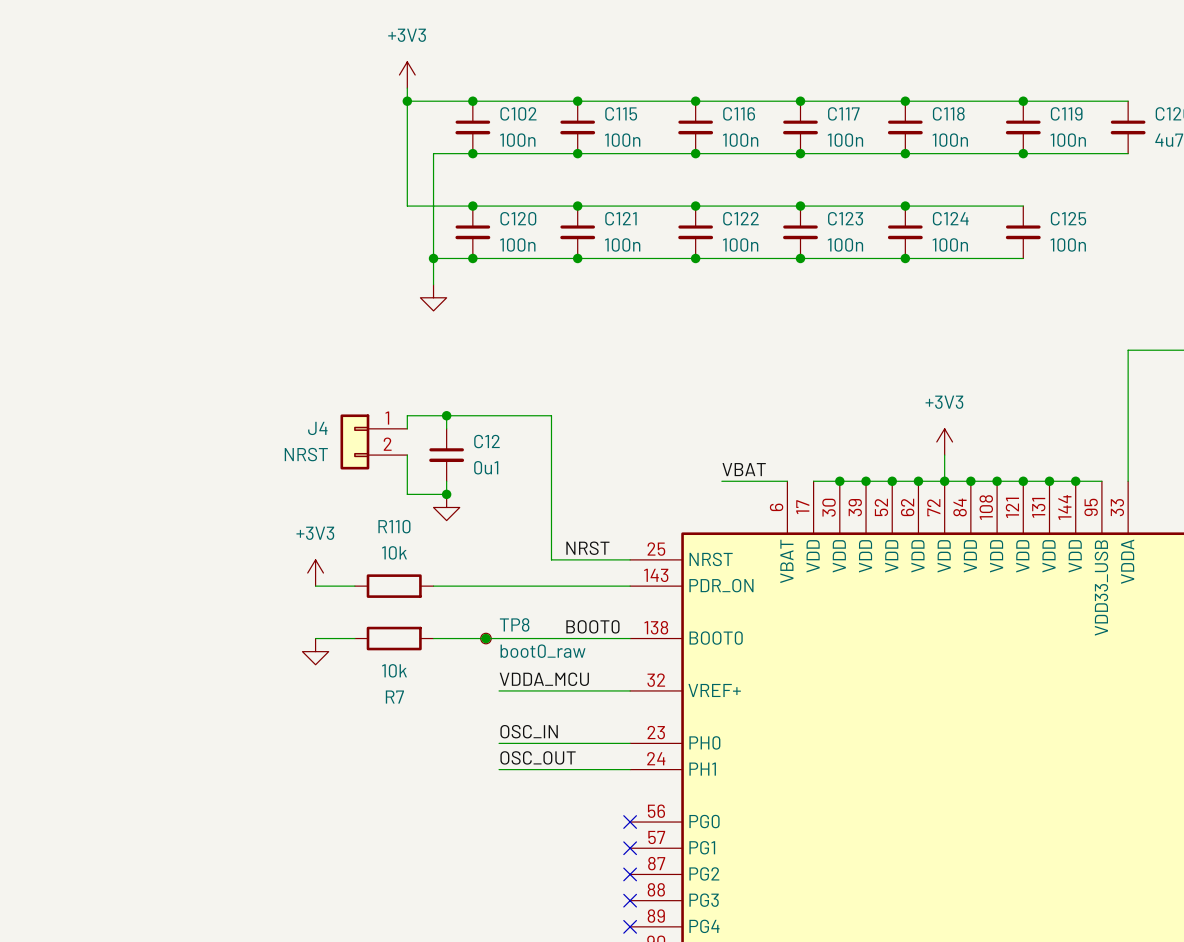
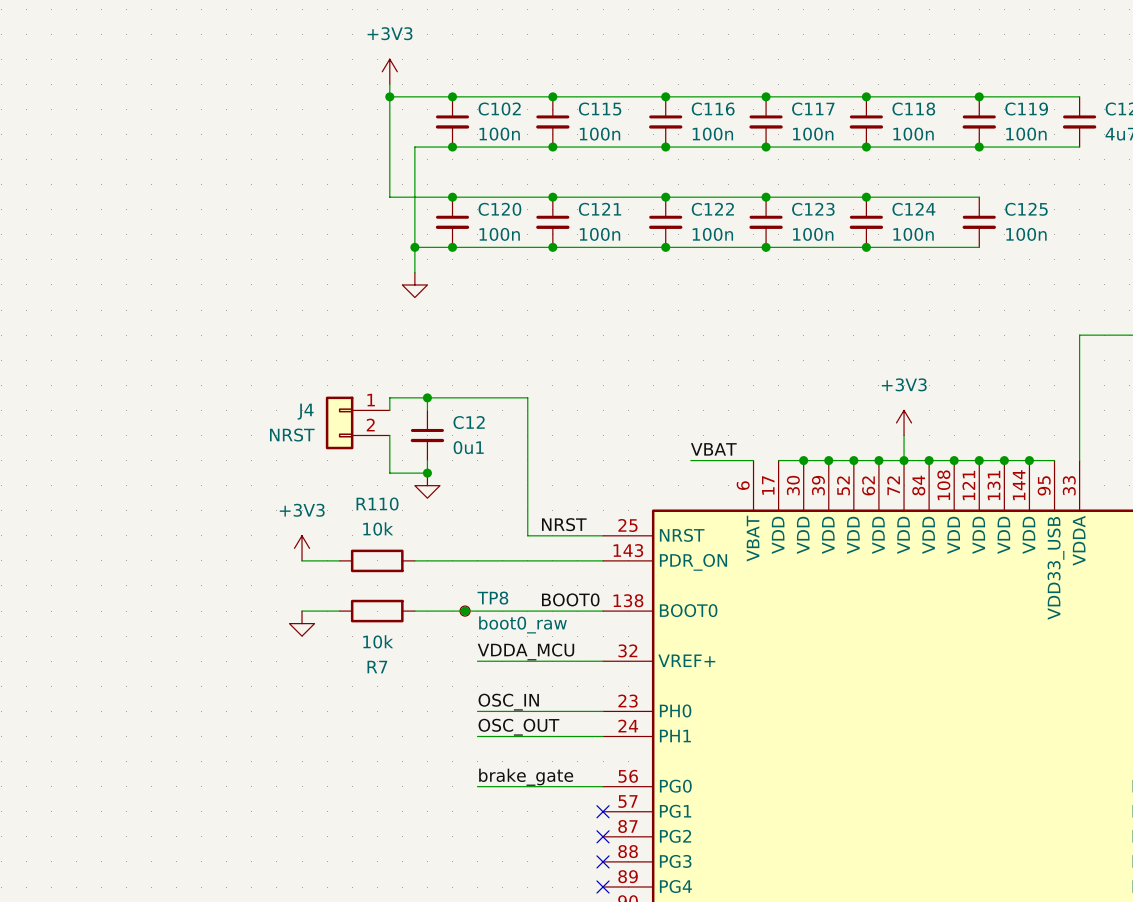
label: none -> brake_gate (526, 777)
wire: none -> (477, 786) (603, 786)
no-connect mark: (630, 822) -> none

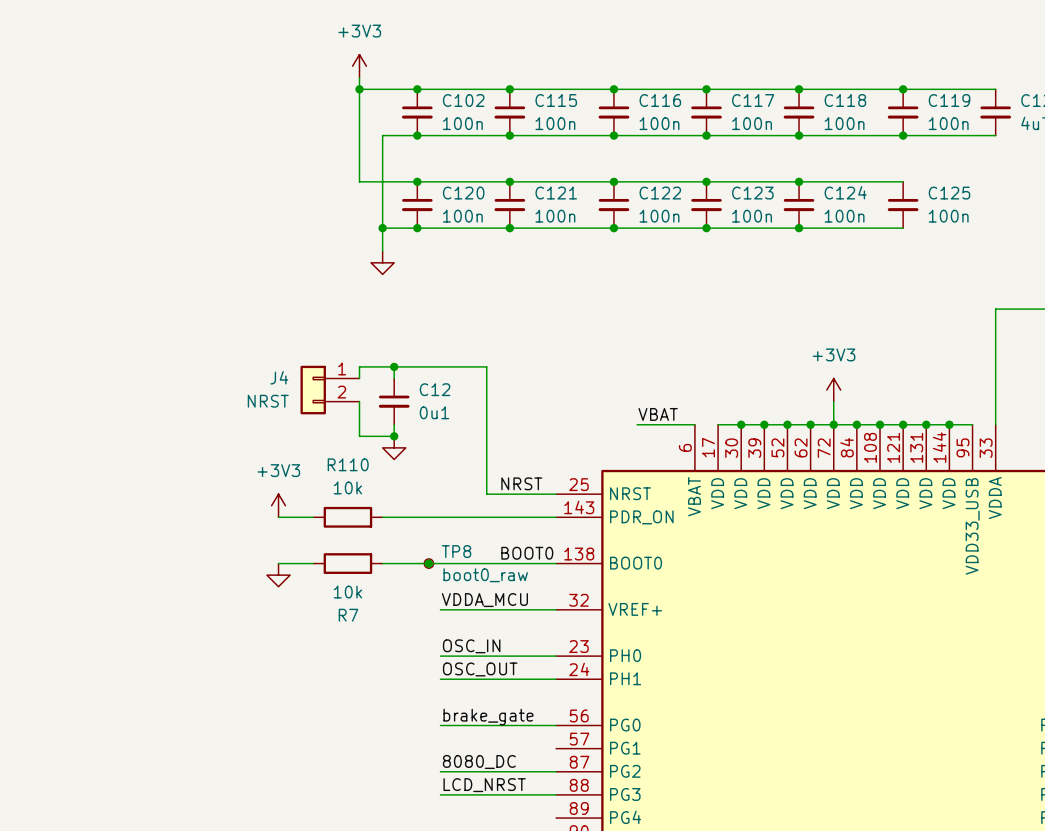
no-connect mark: (603, 811) -> none
label: none -> 8080_DC (479, 761)
wire: none -> (440, 771) (556, 771)
no-connect mark: (603, 836) -> none
label: none -> LCD_NRST (484, 785)
wire: none -> (440, 794) (556, 794)
no-connect mark: (603, 861) -> none
no-connect mark: (603, 887) -> none

